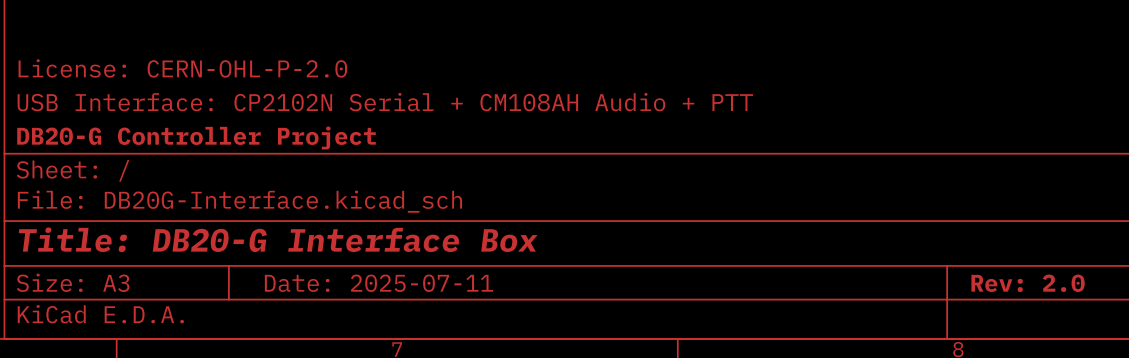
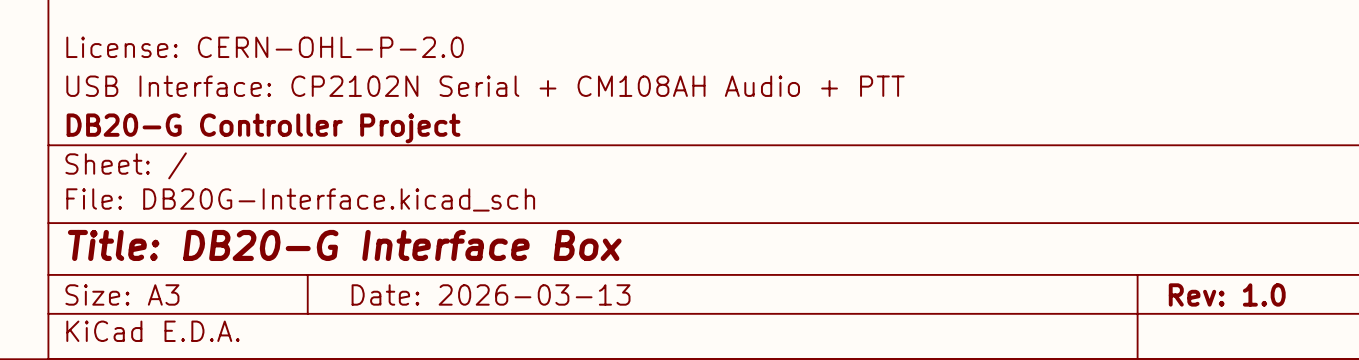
title block: Date: 2025-07-11 (378, 283) -> Date: 2026-03-13 (491, 294)
title block: Rev: 2.0 (1028, 283) -> Rev: 1.0 (1227, 294)

